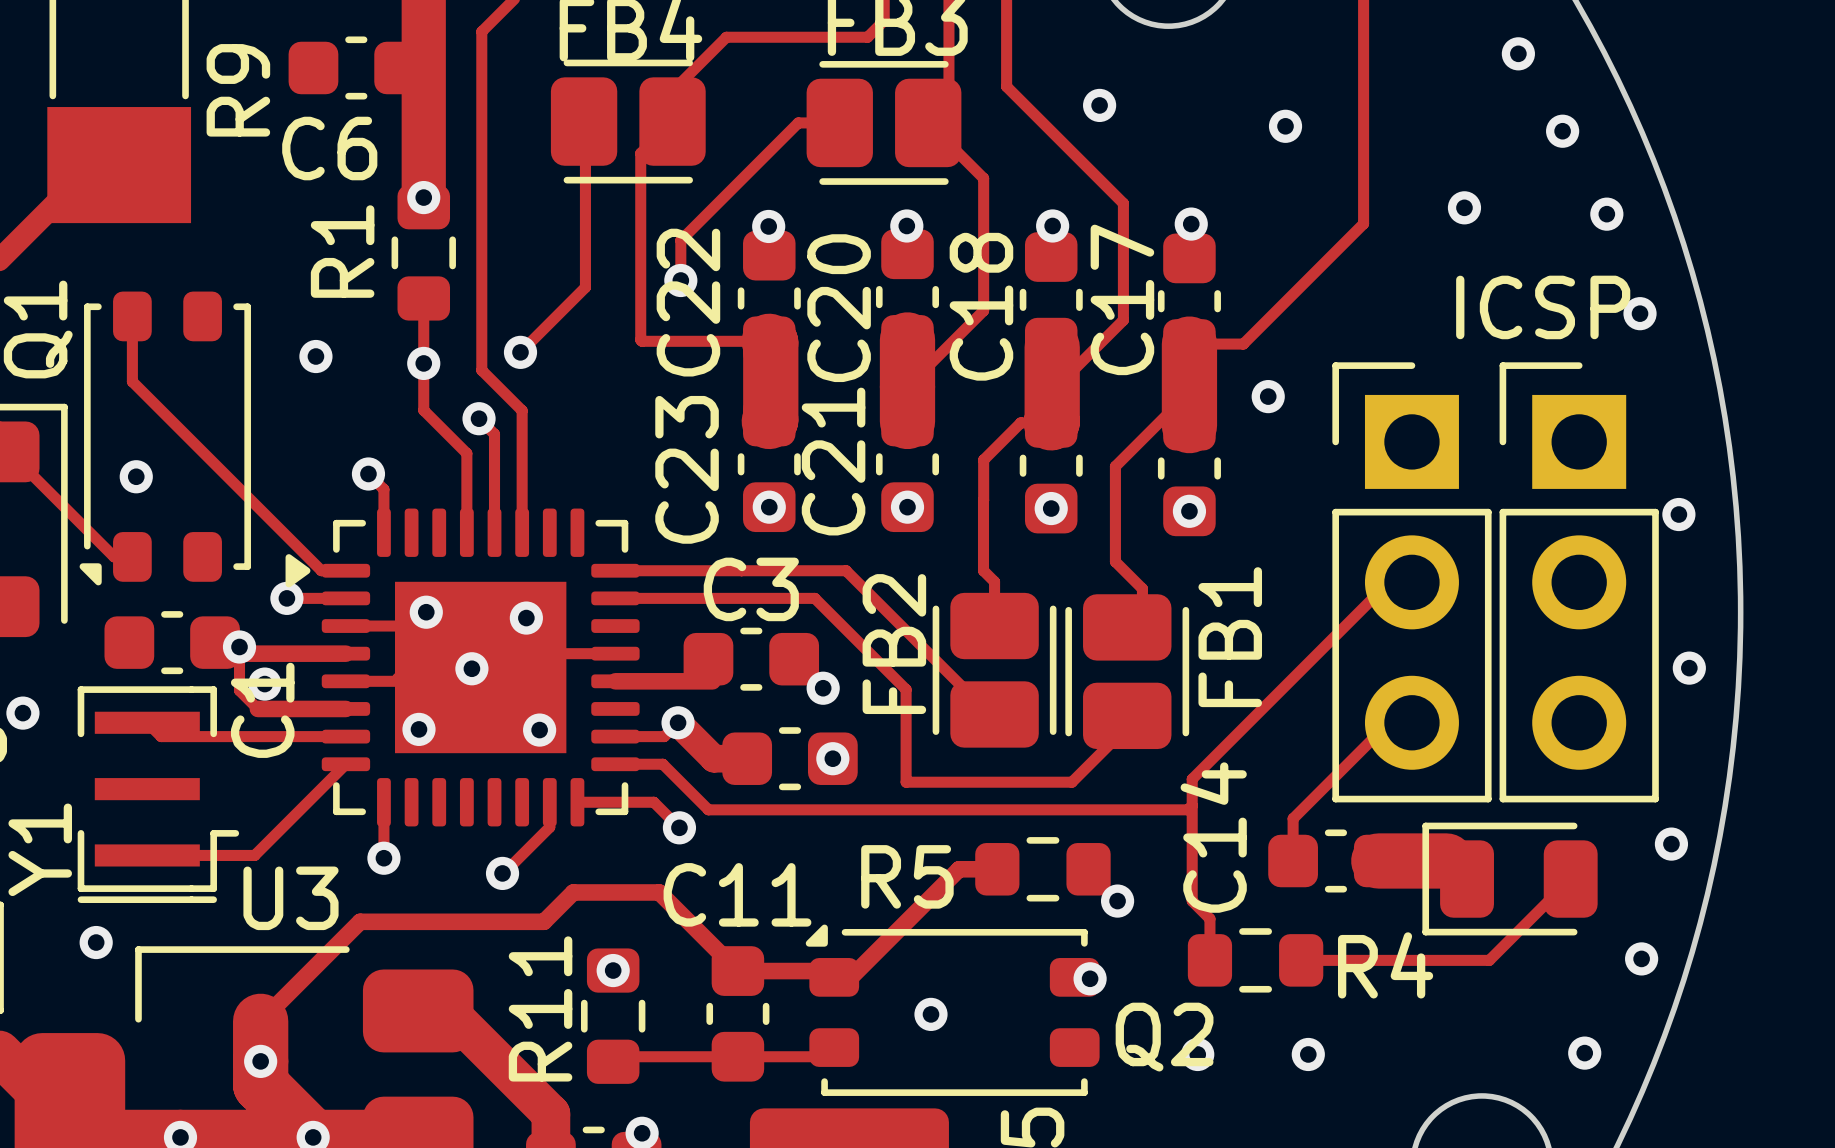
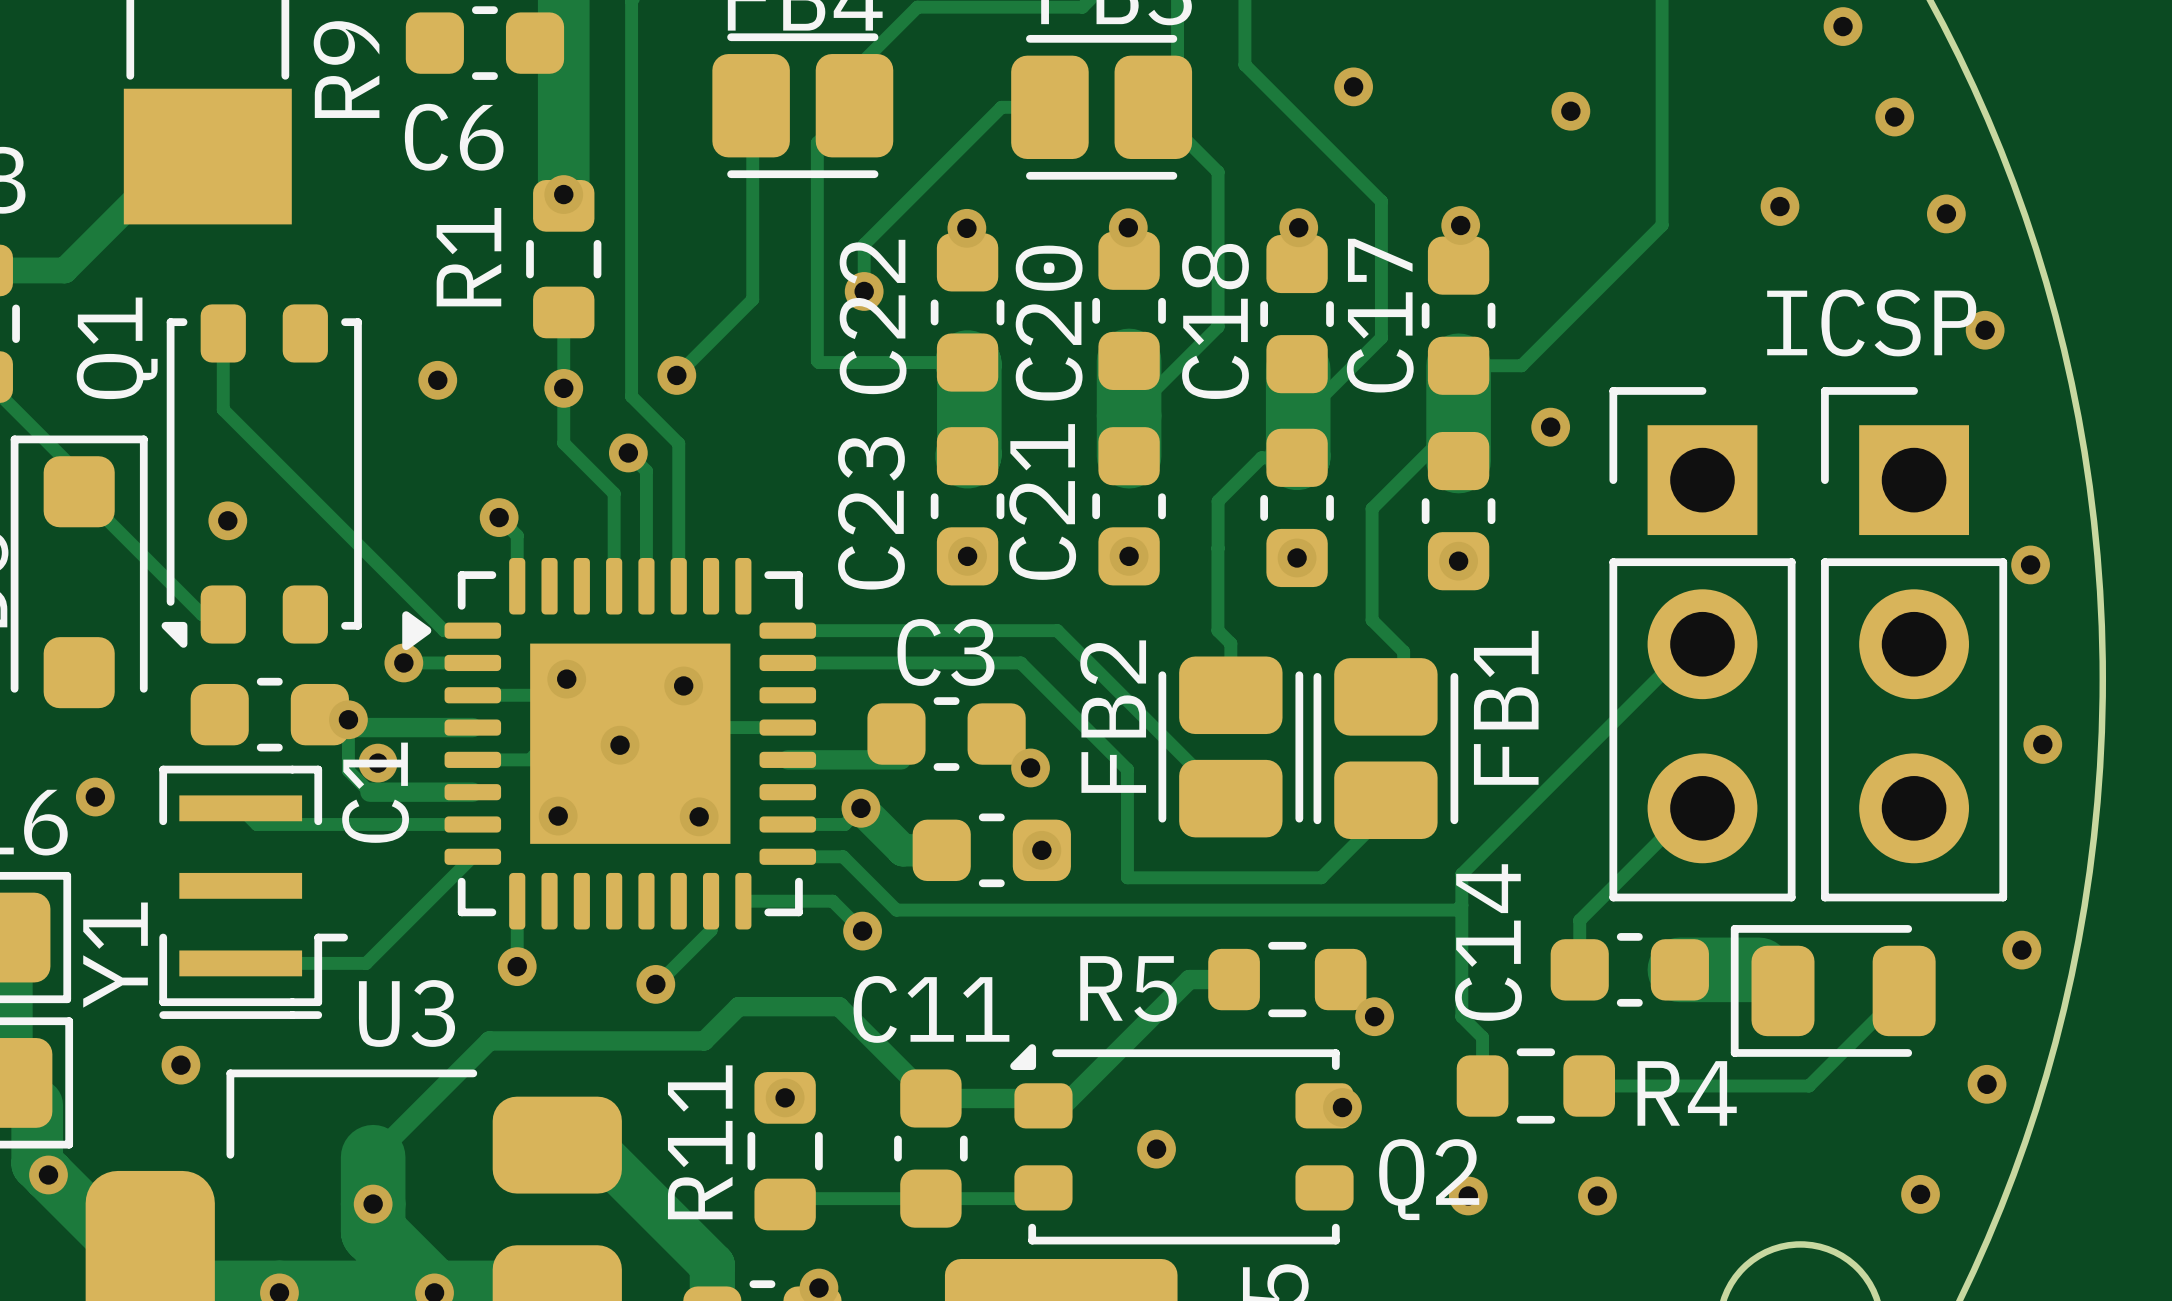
part position: (1411, 582) -> (1702, 644)

